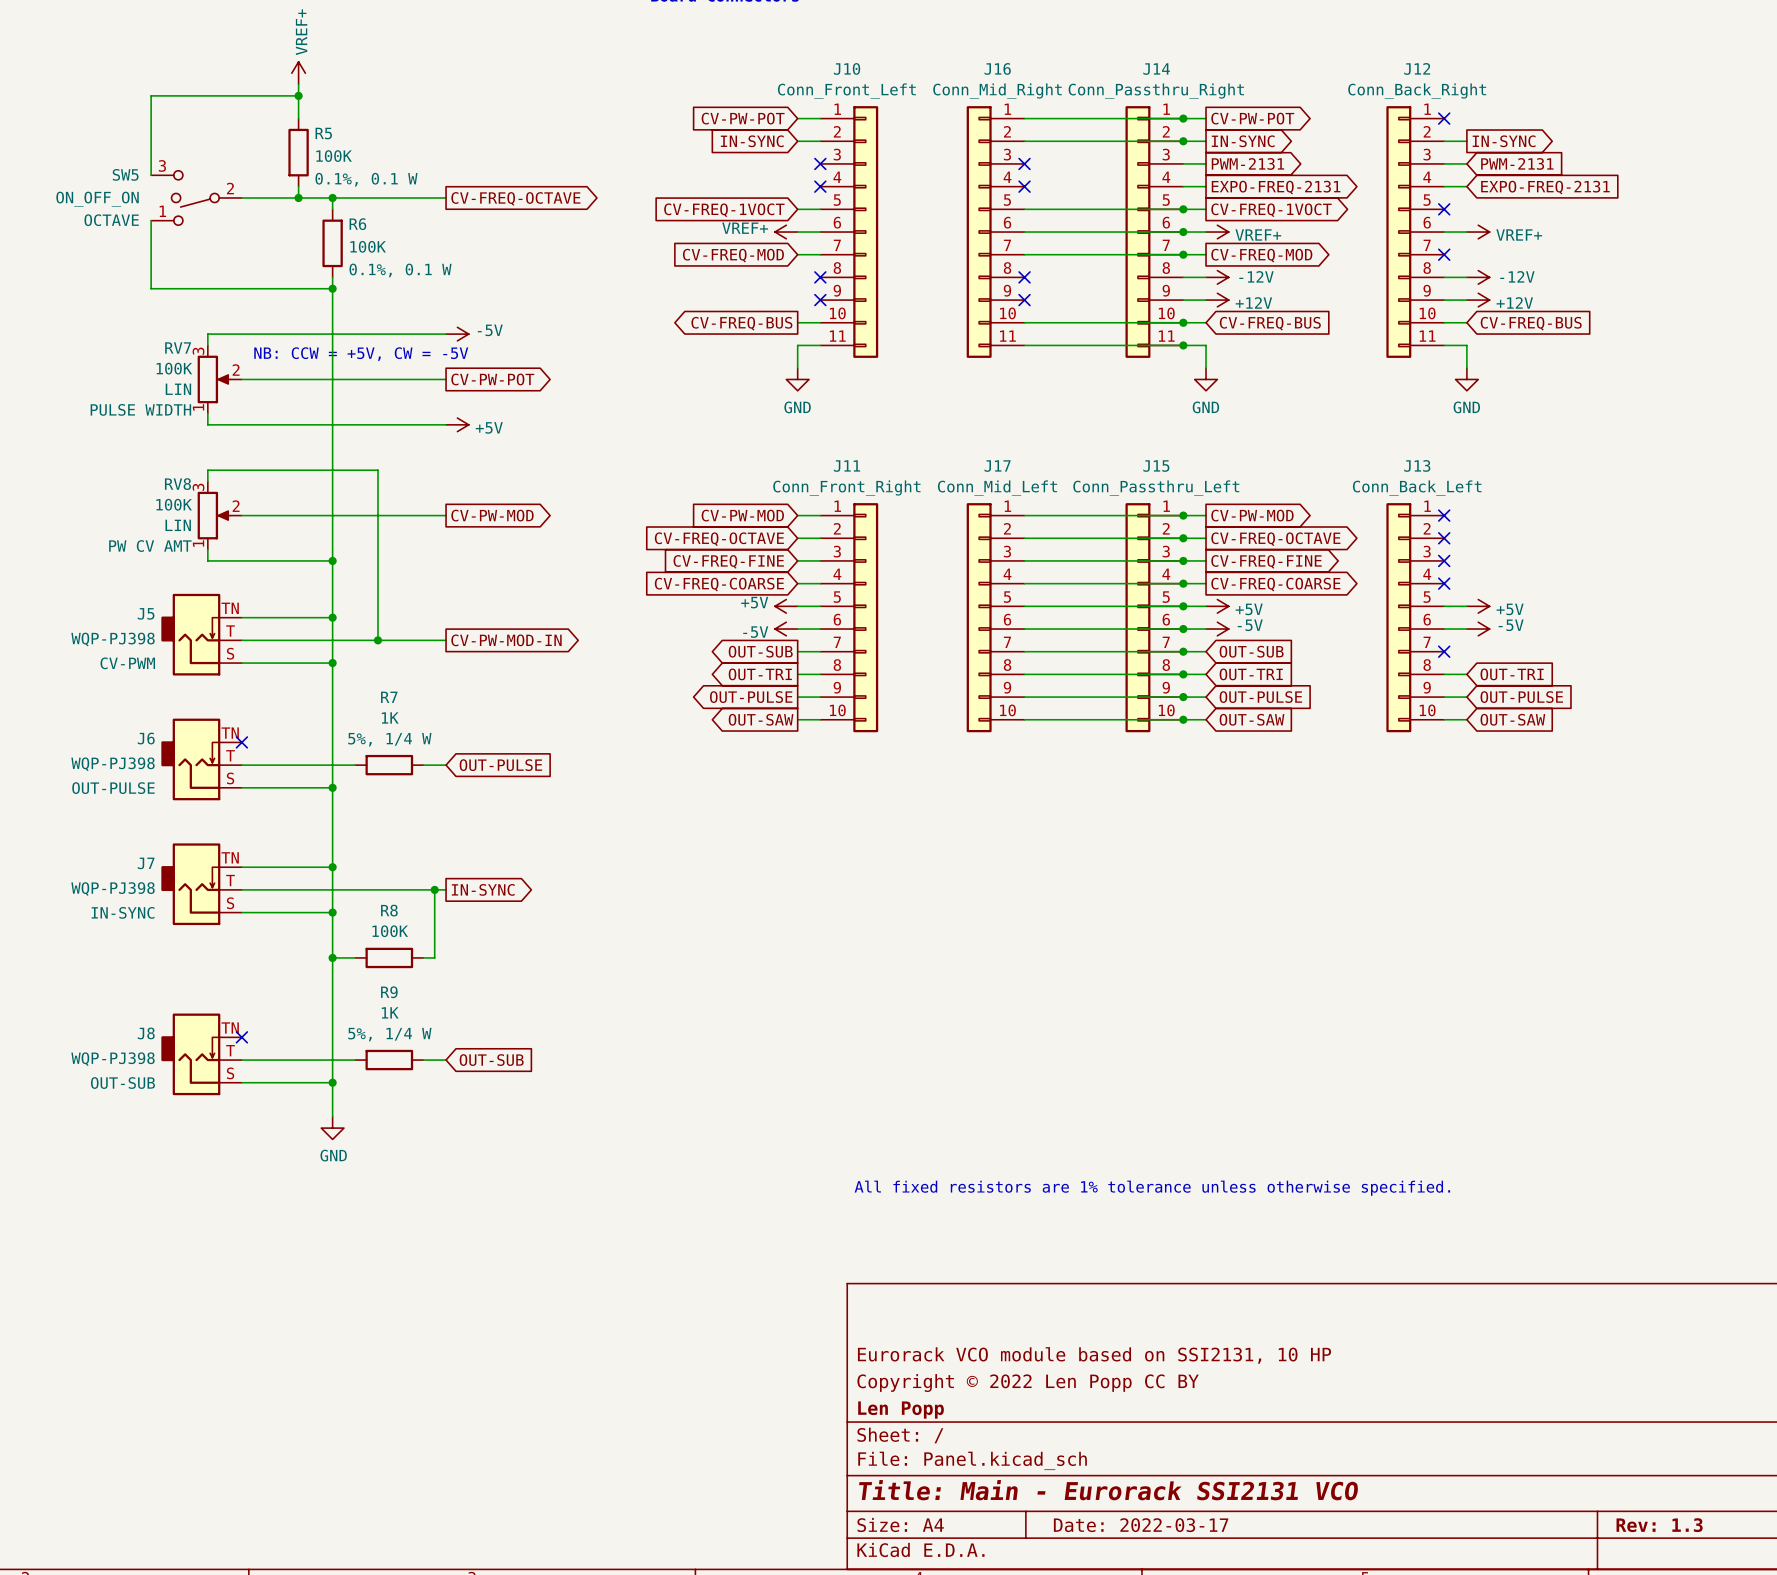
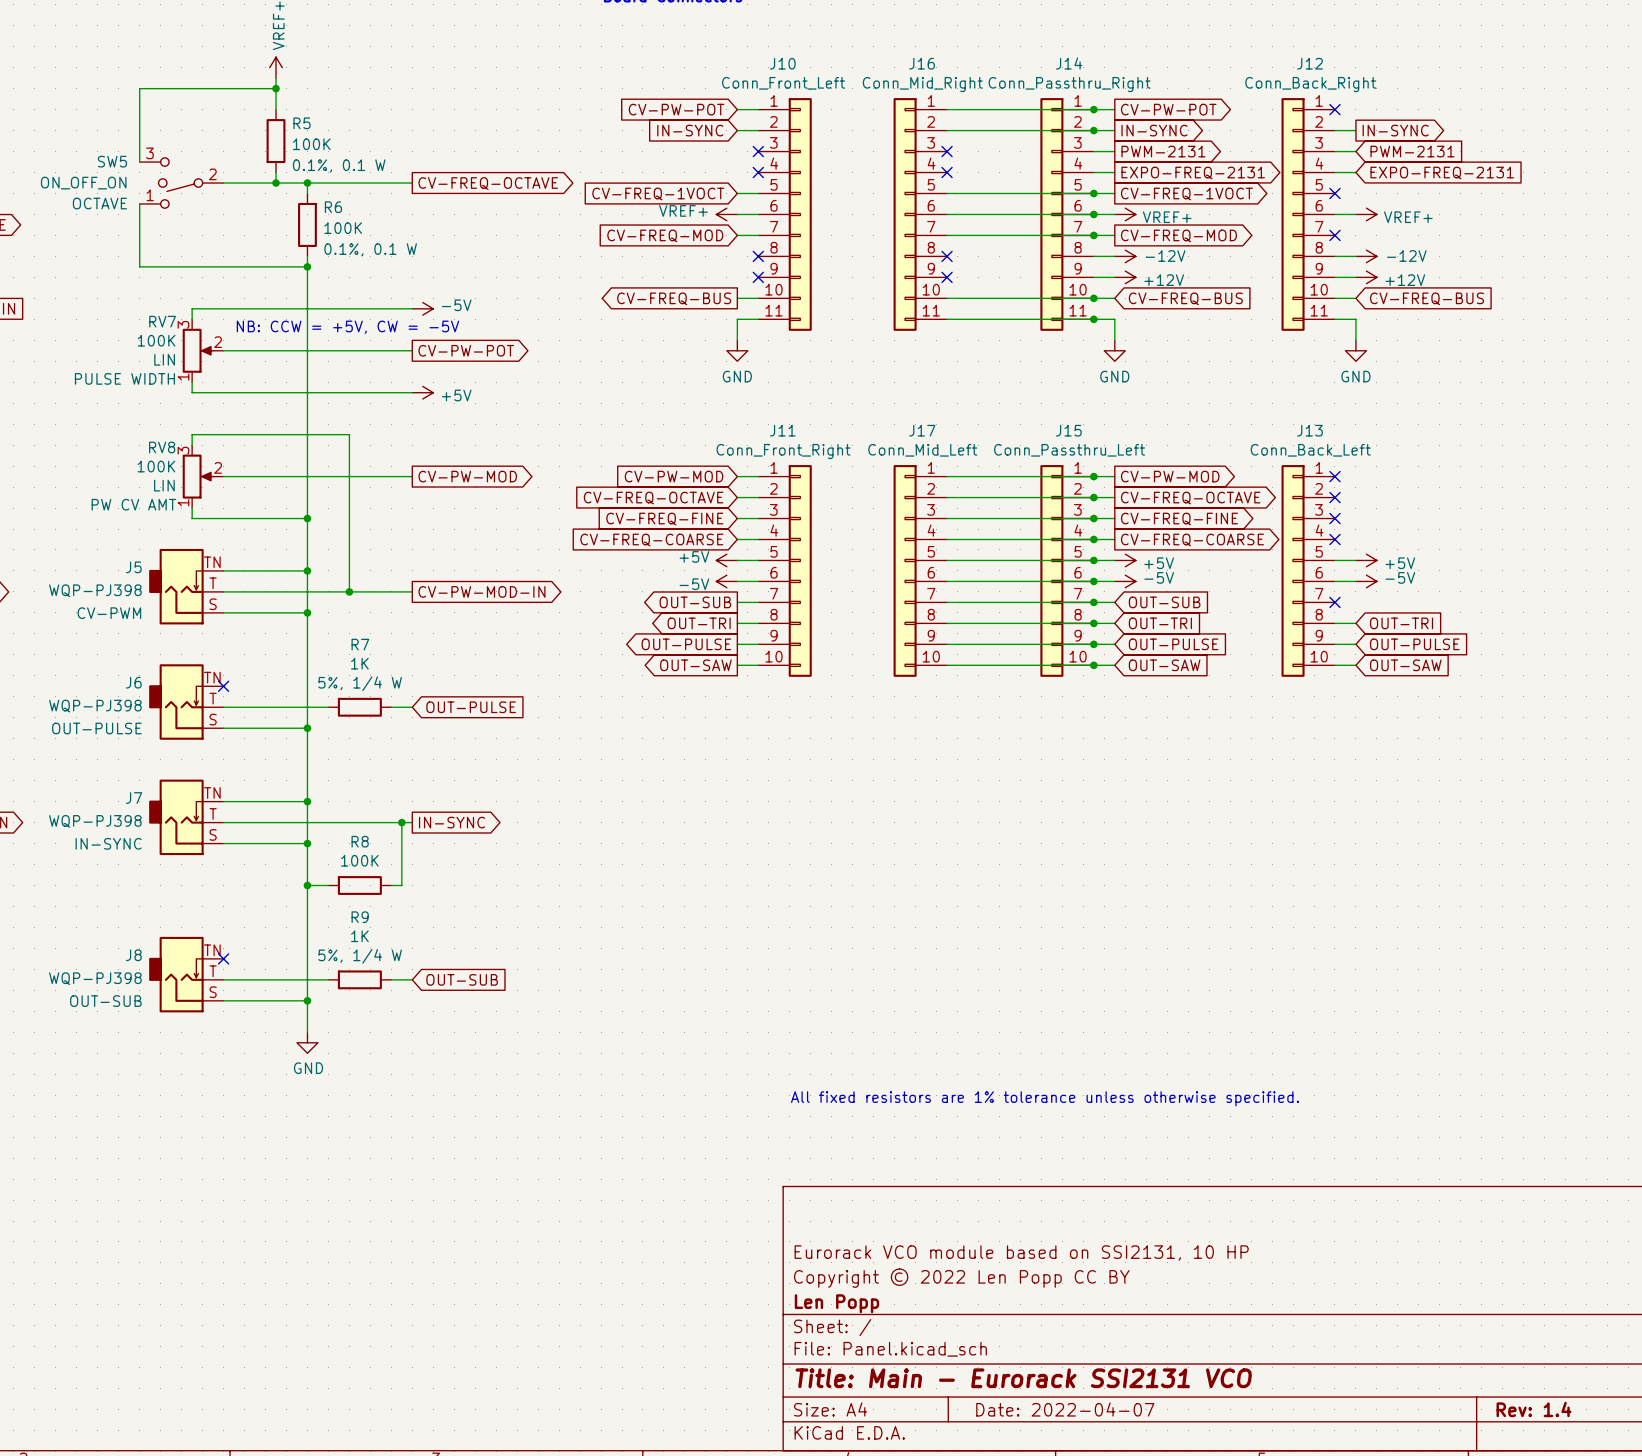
title block: Date: 2022-03-17 (1141, 1525) -> Date: 2022-04-07 (1065, 1409)
title block: Rev: 1.3 (1659, 1525) -> Rev: 1.4 (1534, 1409)

